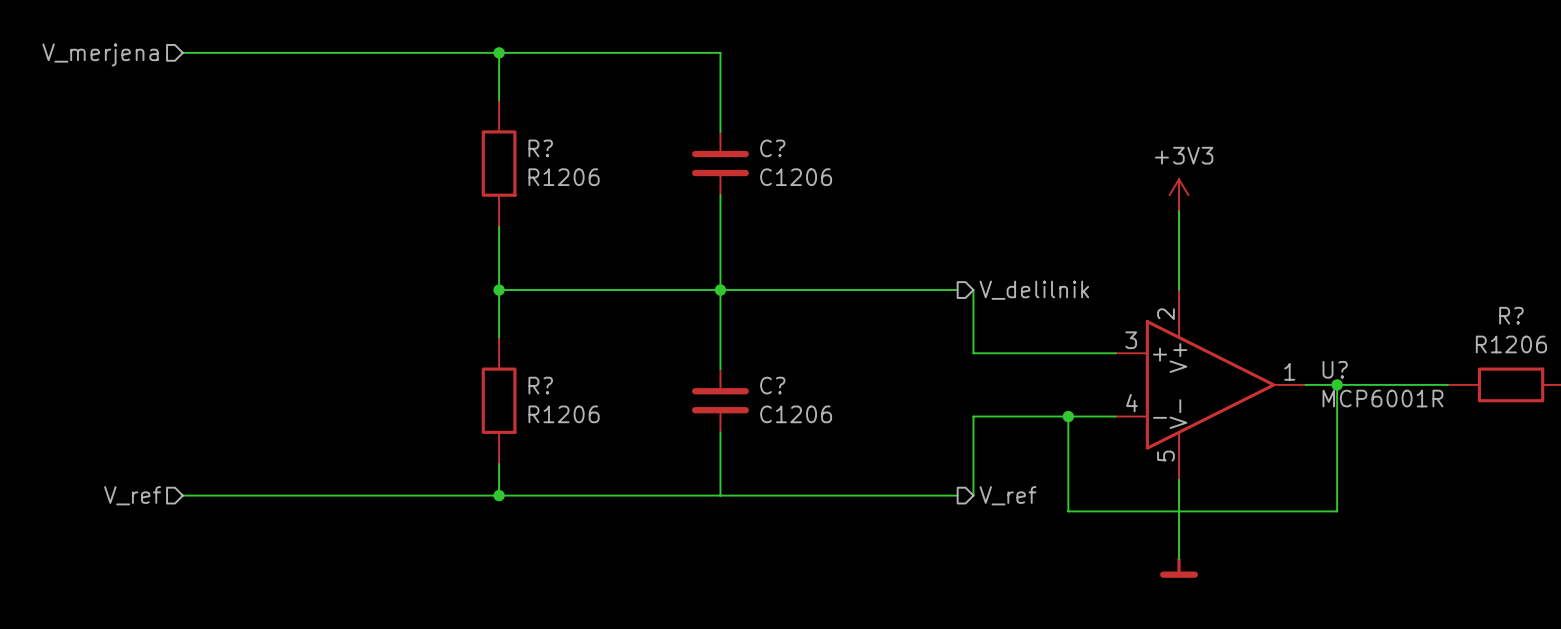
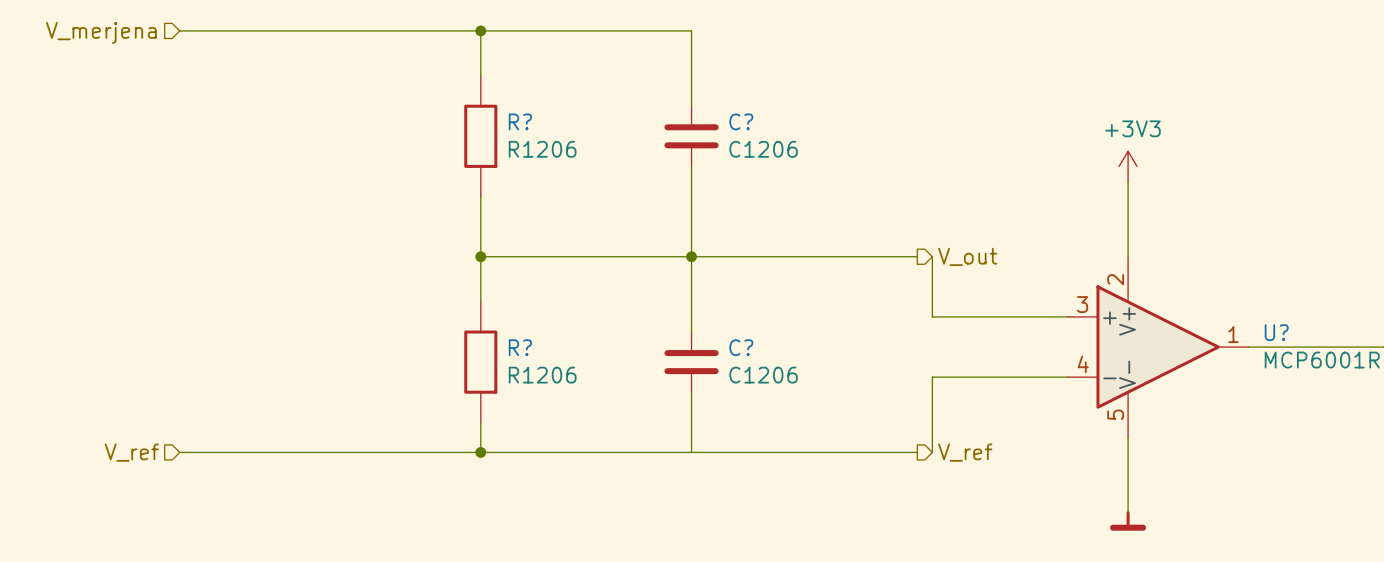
hierarchical label: V_delilnik (1034, 290) -> V_out (967, 256)
wire: (1337, 384) (1337, 511) (1068, 511) (1068, 416) -> none
junction: (1337, 384) -> none
junction: (1068, 416) -> none

